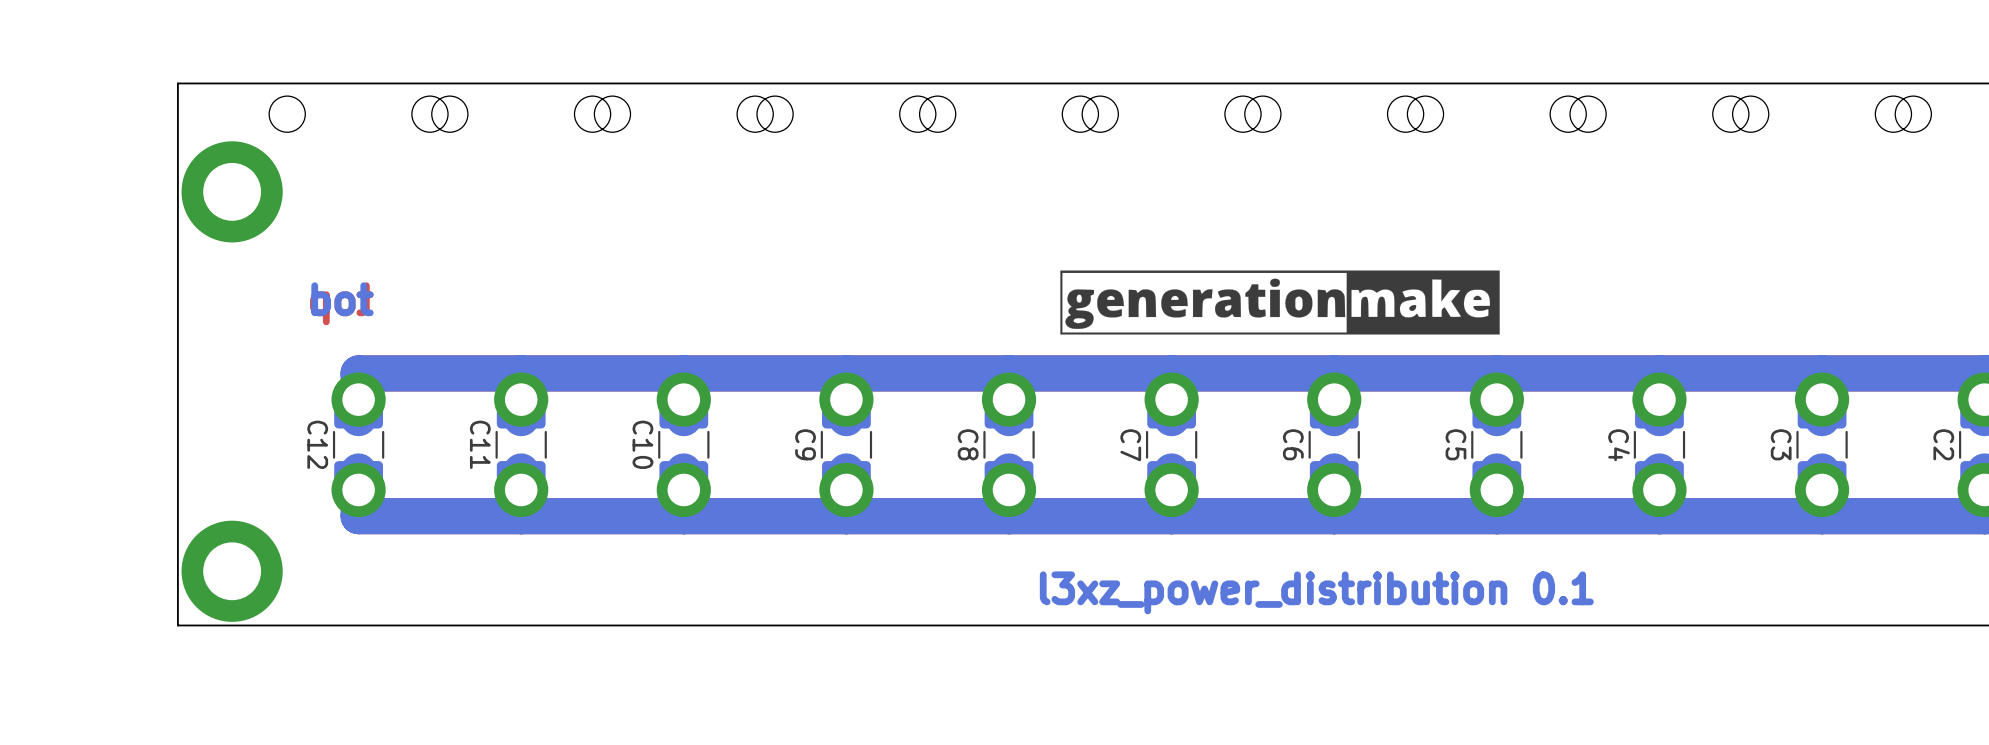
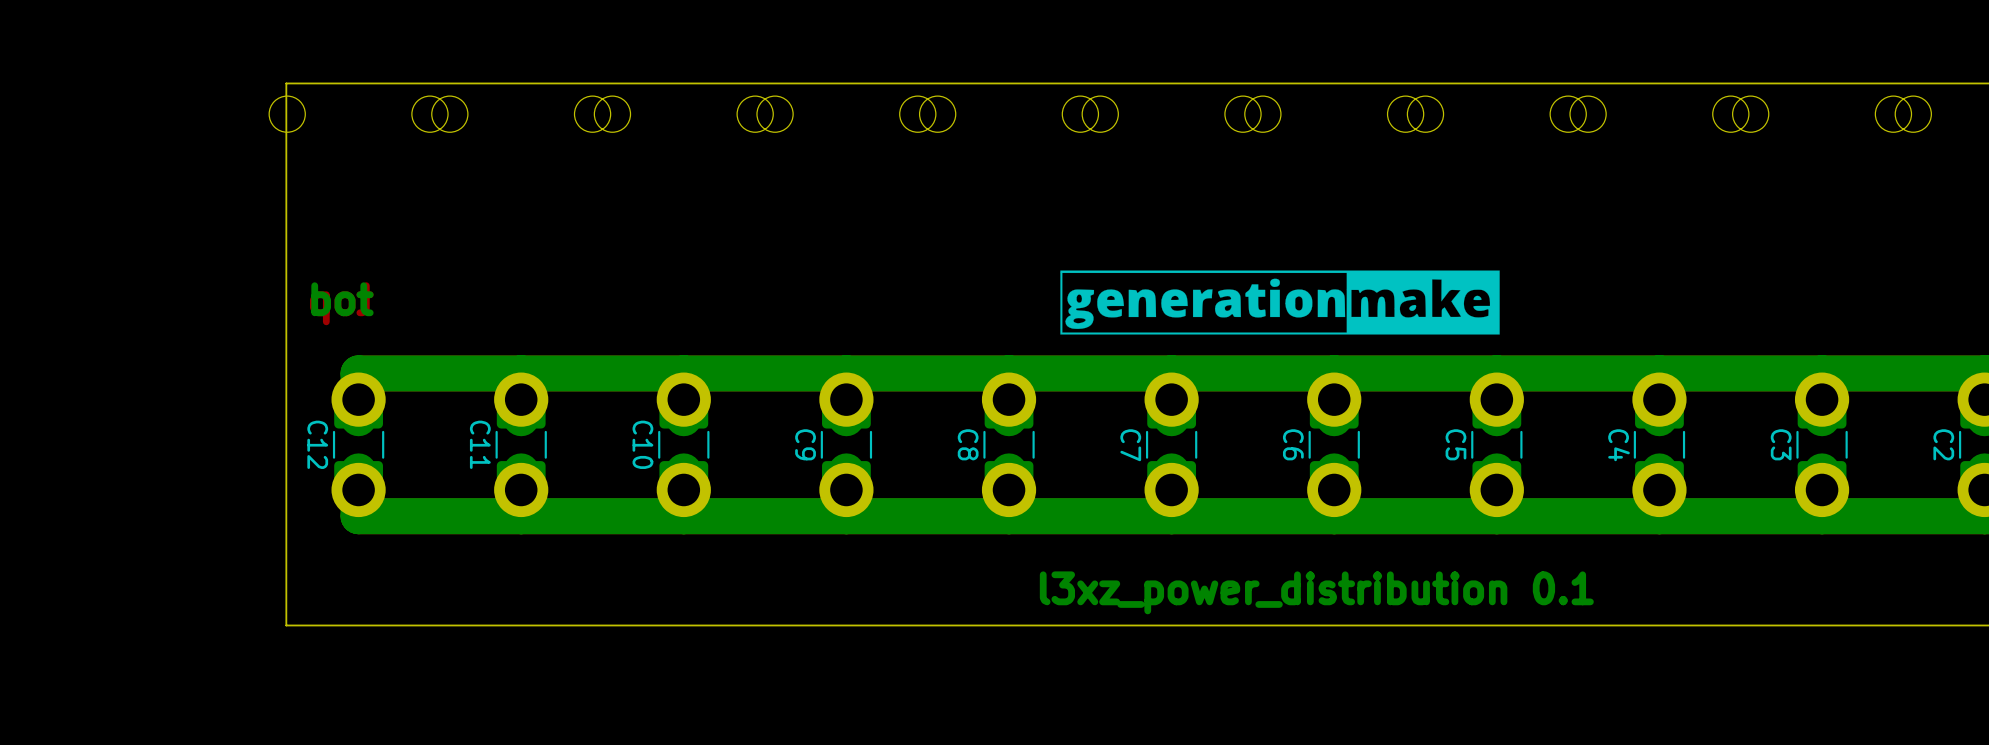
board edge: (286, 83) (177, 83) (177, 625) (286, 625) -> (286, 83) (286, 625)
part: (232, 191) -> none
part: (232, 571) -> none

